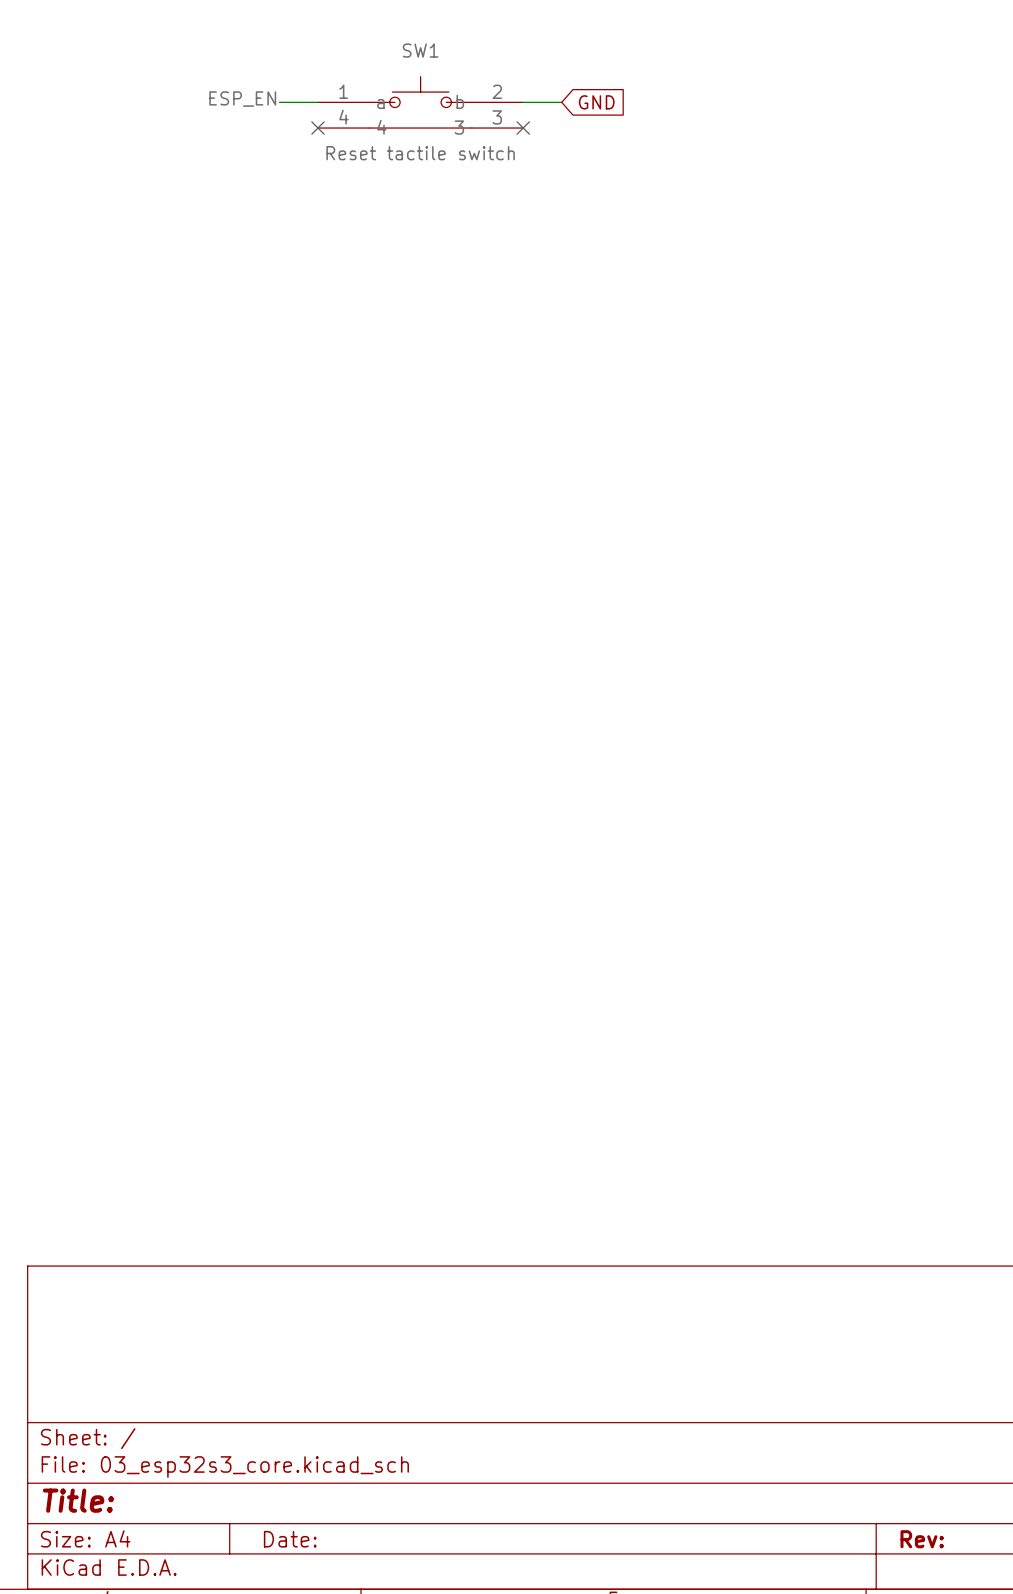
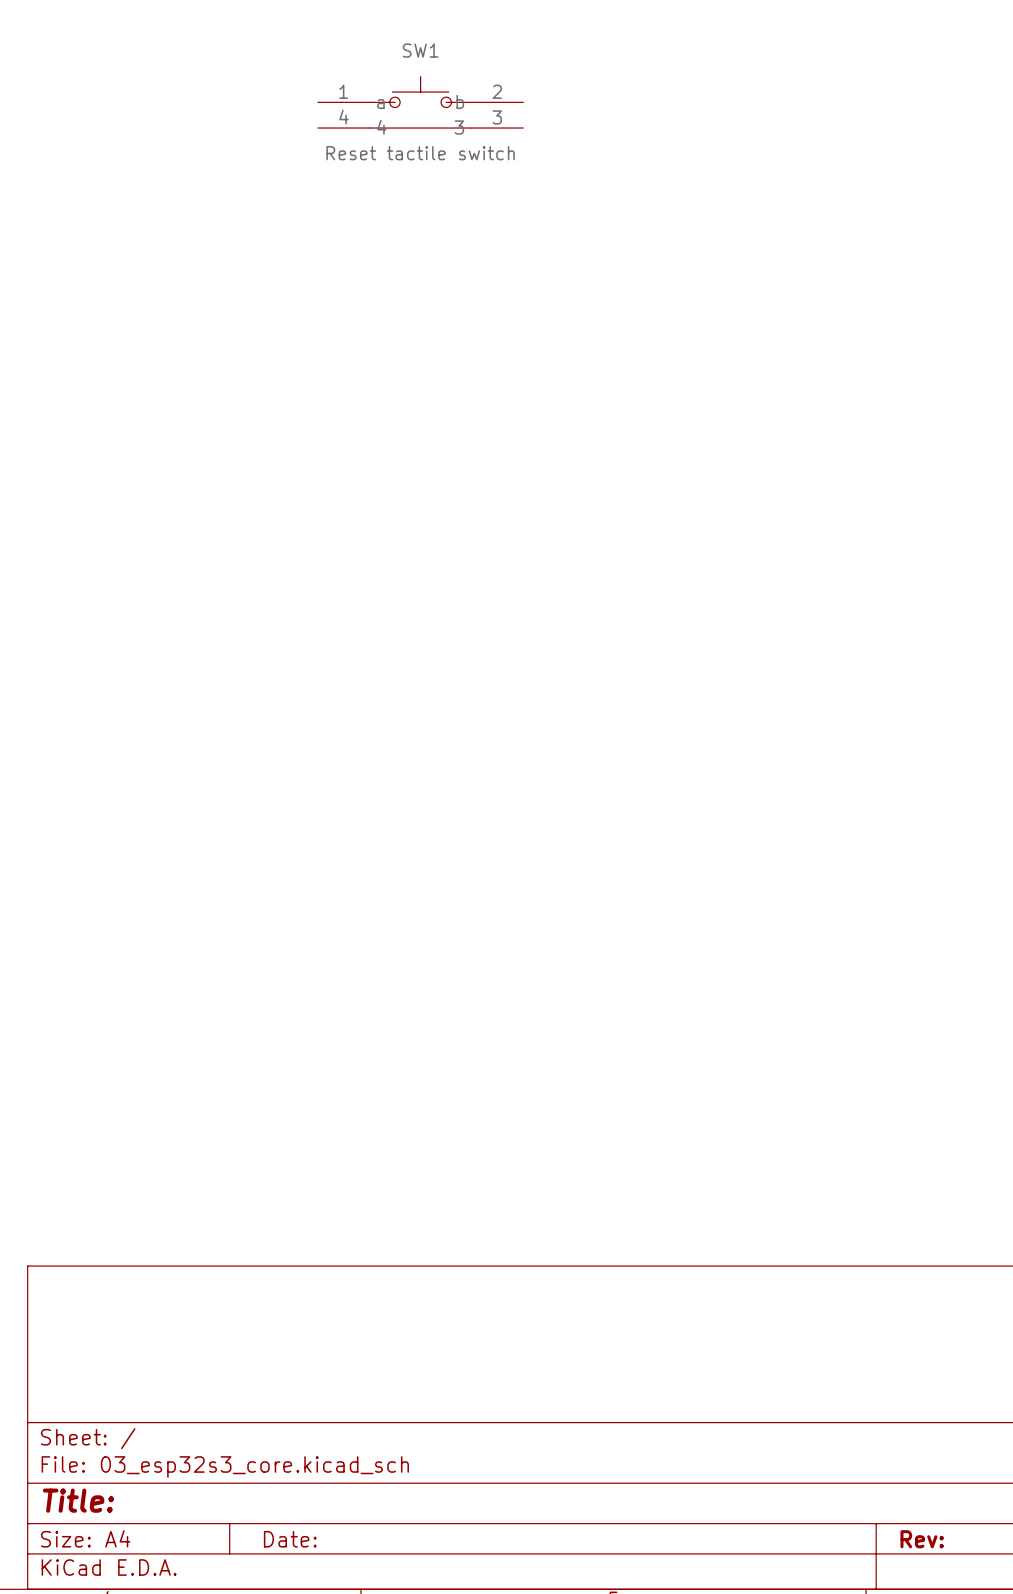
label: ESP_EN (242, 99) -> none
wire: (279, 102) (317, 102) -> none
wire: (523, 102) (561, 102) -> none
global label: GND (596, 102) -> none
no-connect mark: (317, 128) -> none
no-connect mark: (523, 128) -> none

